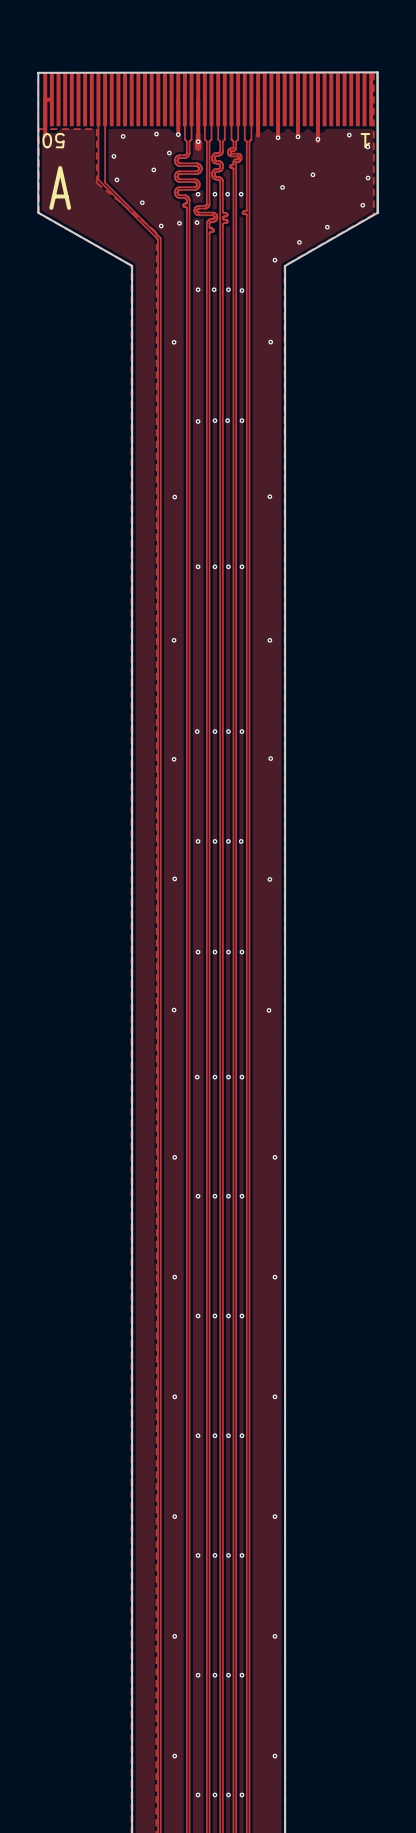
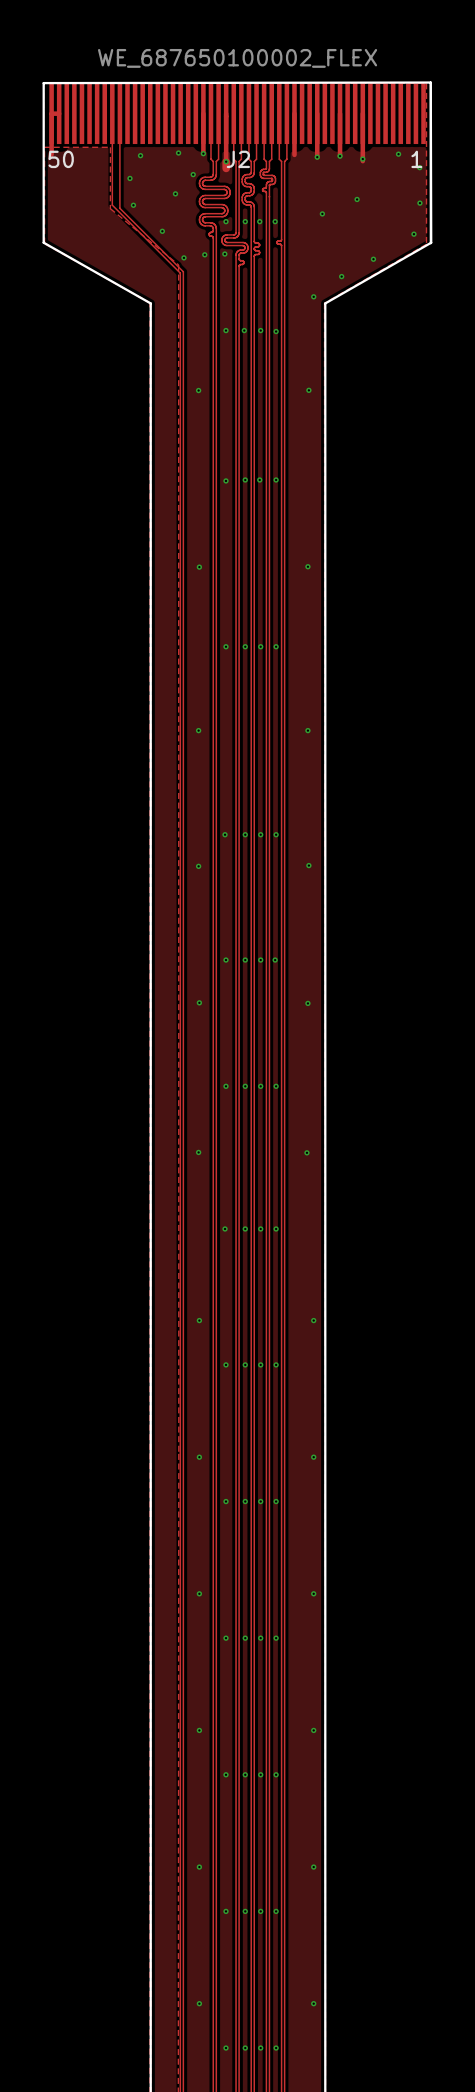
J2 value: none -> WE_687650100002_FLEX (237, 58)
J2 name: none -> J2 (238, 159)
text rotation: 0° (53, 140) -> 180° (61, 159)
text rotation: 0° (365, 140) -> 180° (416, 159)
text: A (60, 187) -> none

